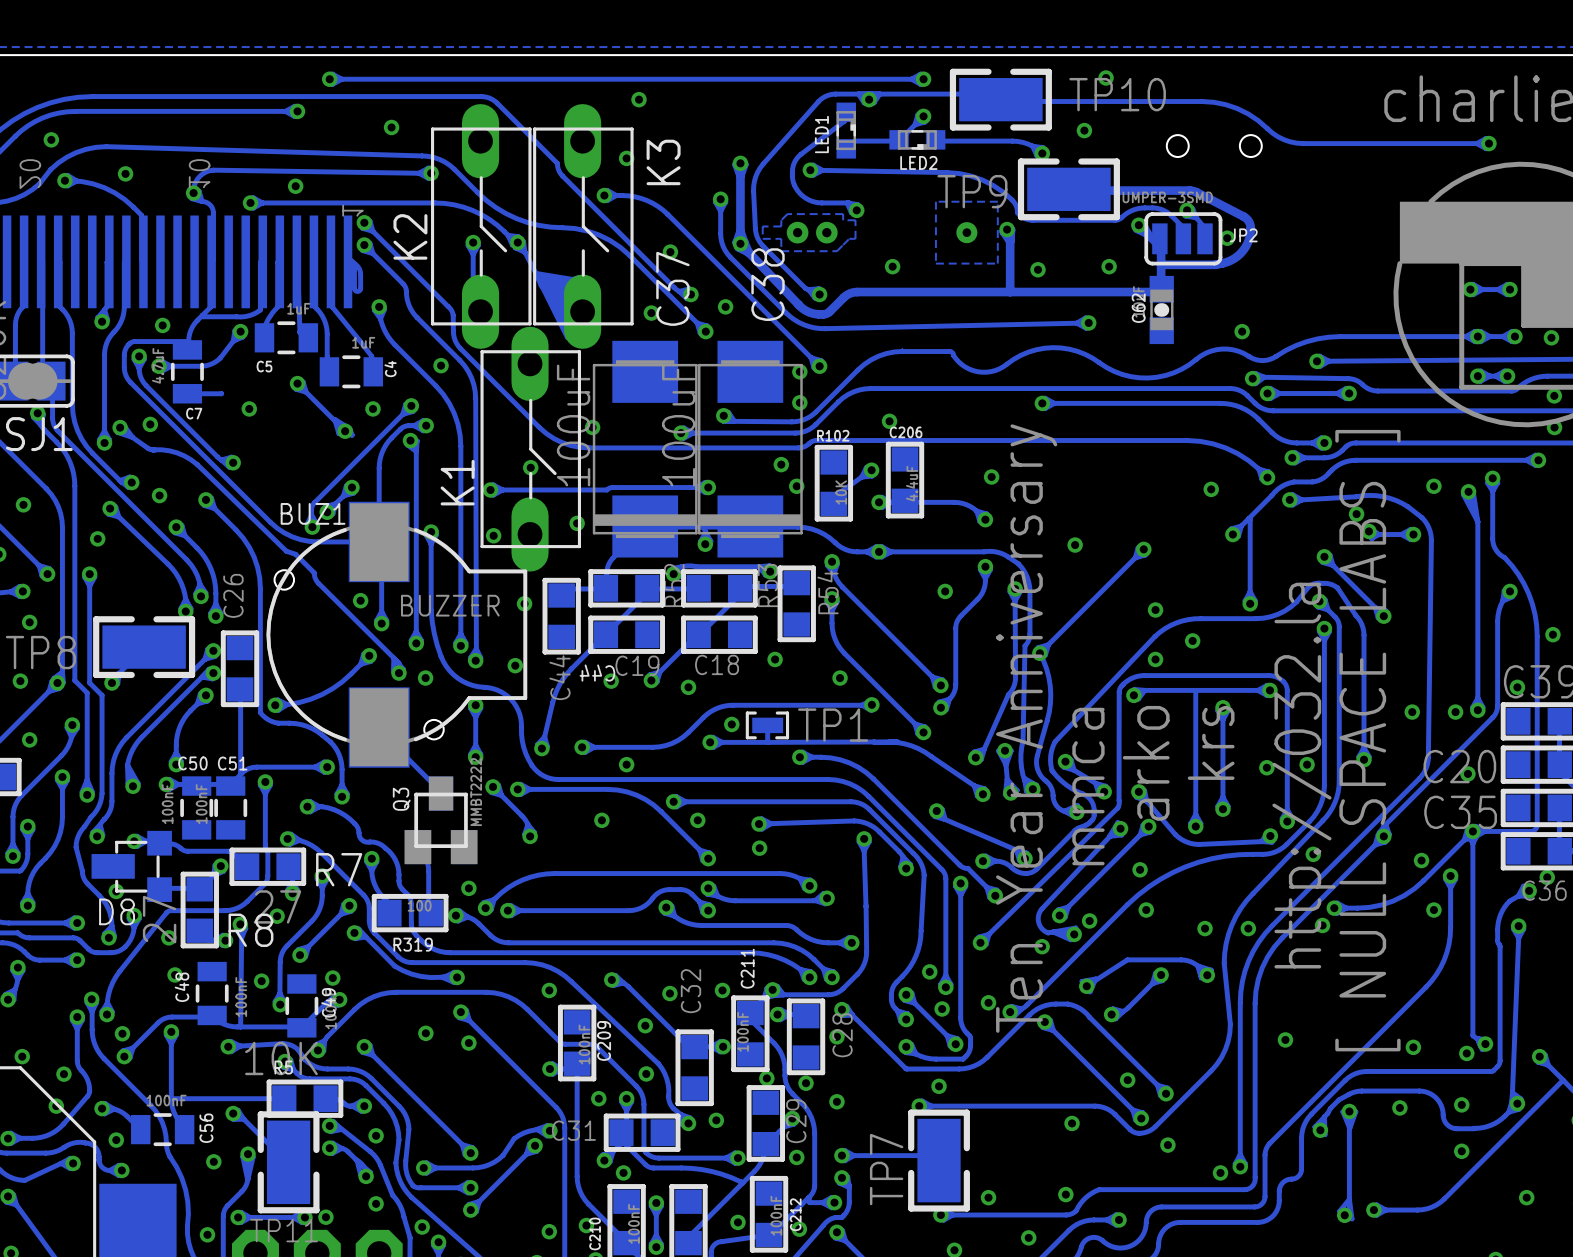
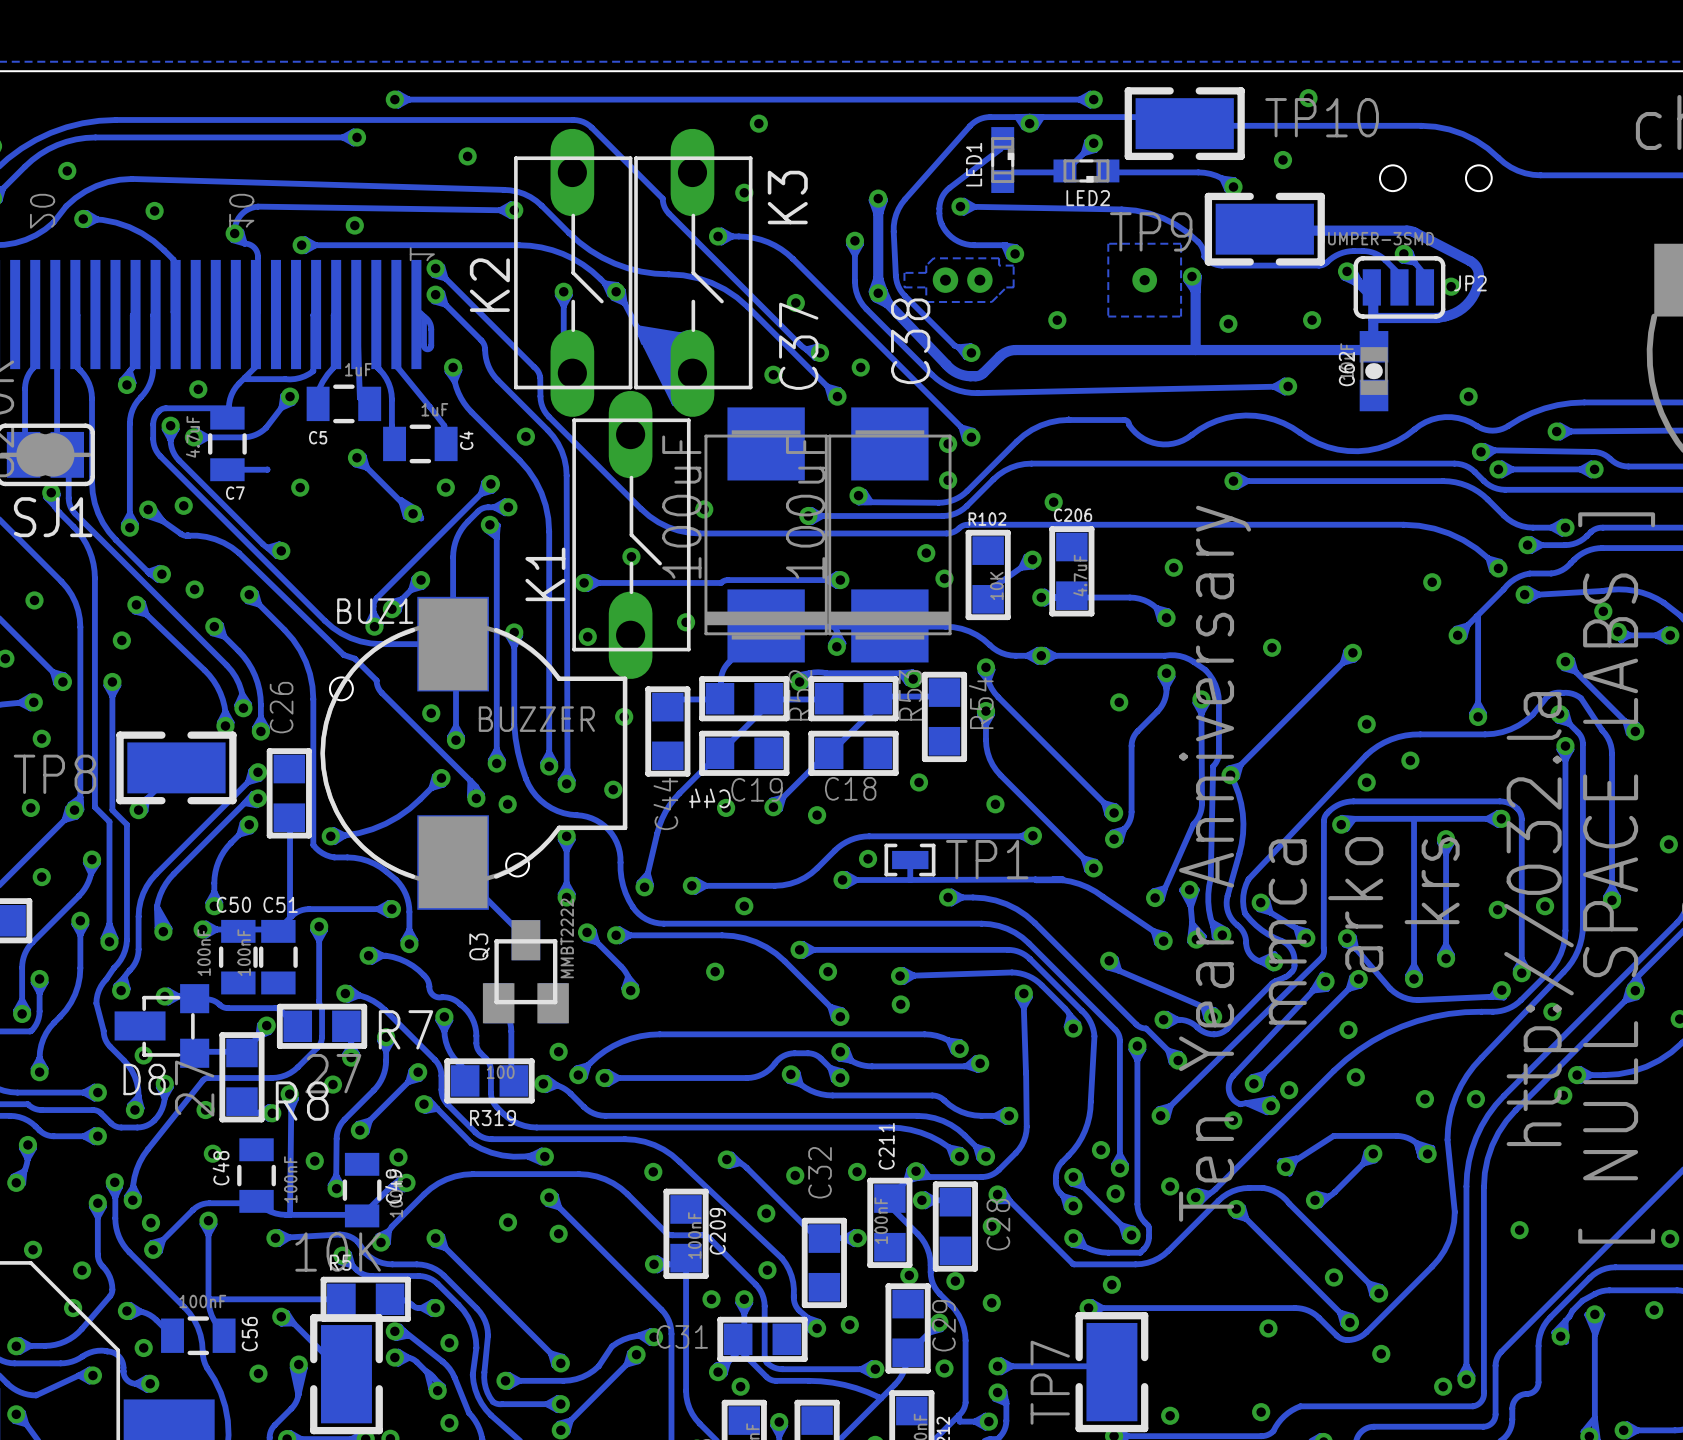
C206 value: 4.4uF (912, 483) -> 4.7uF (1080, 575)

